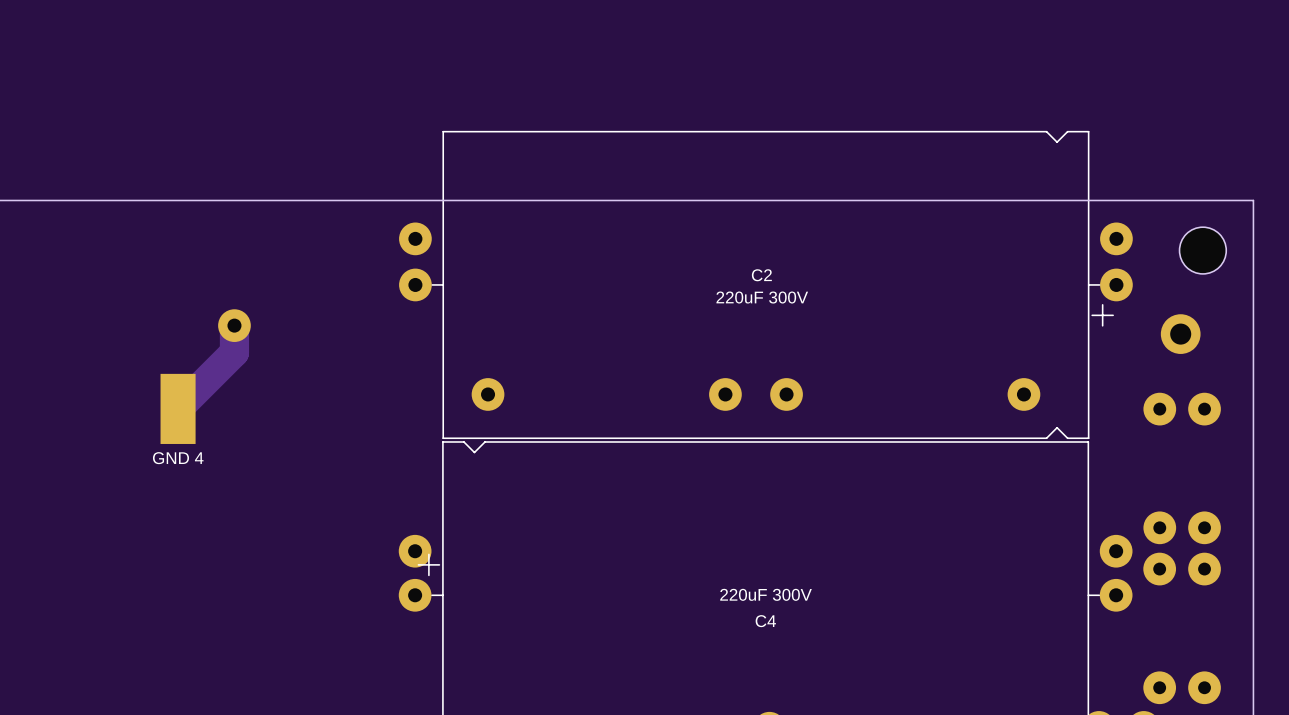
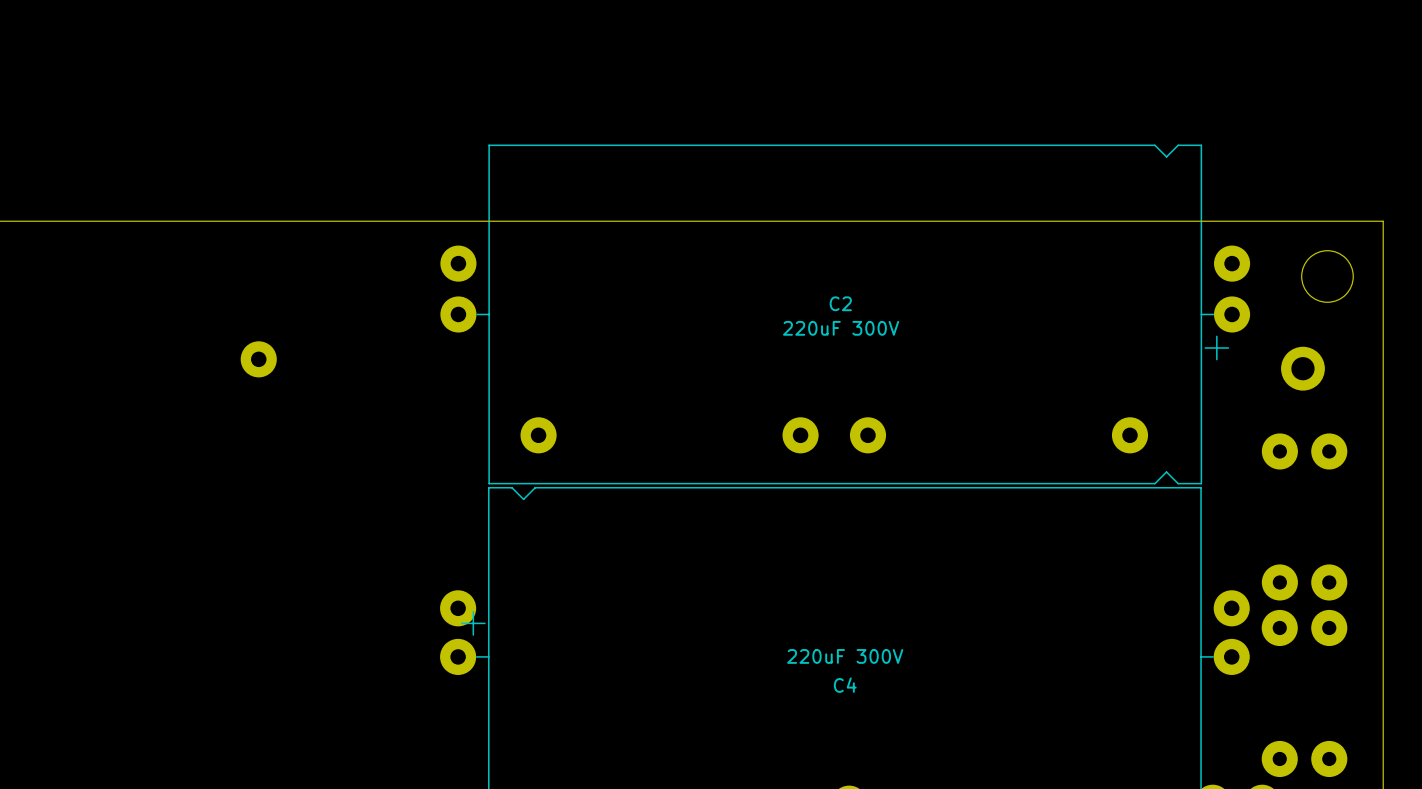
track: (234, 325) (234, 352) (178, 408) -> none
part: GND 4 (178, 408) -> none

